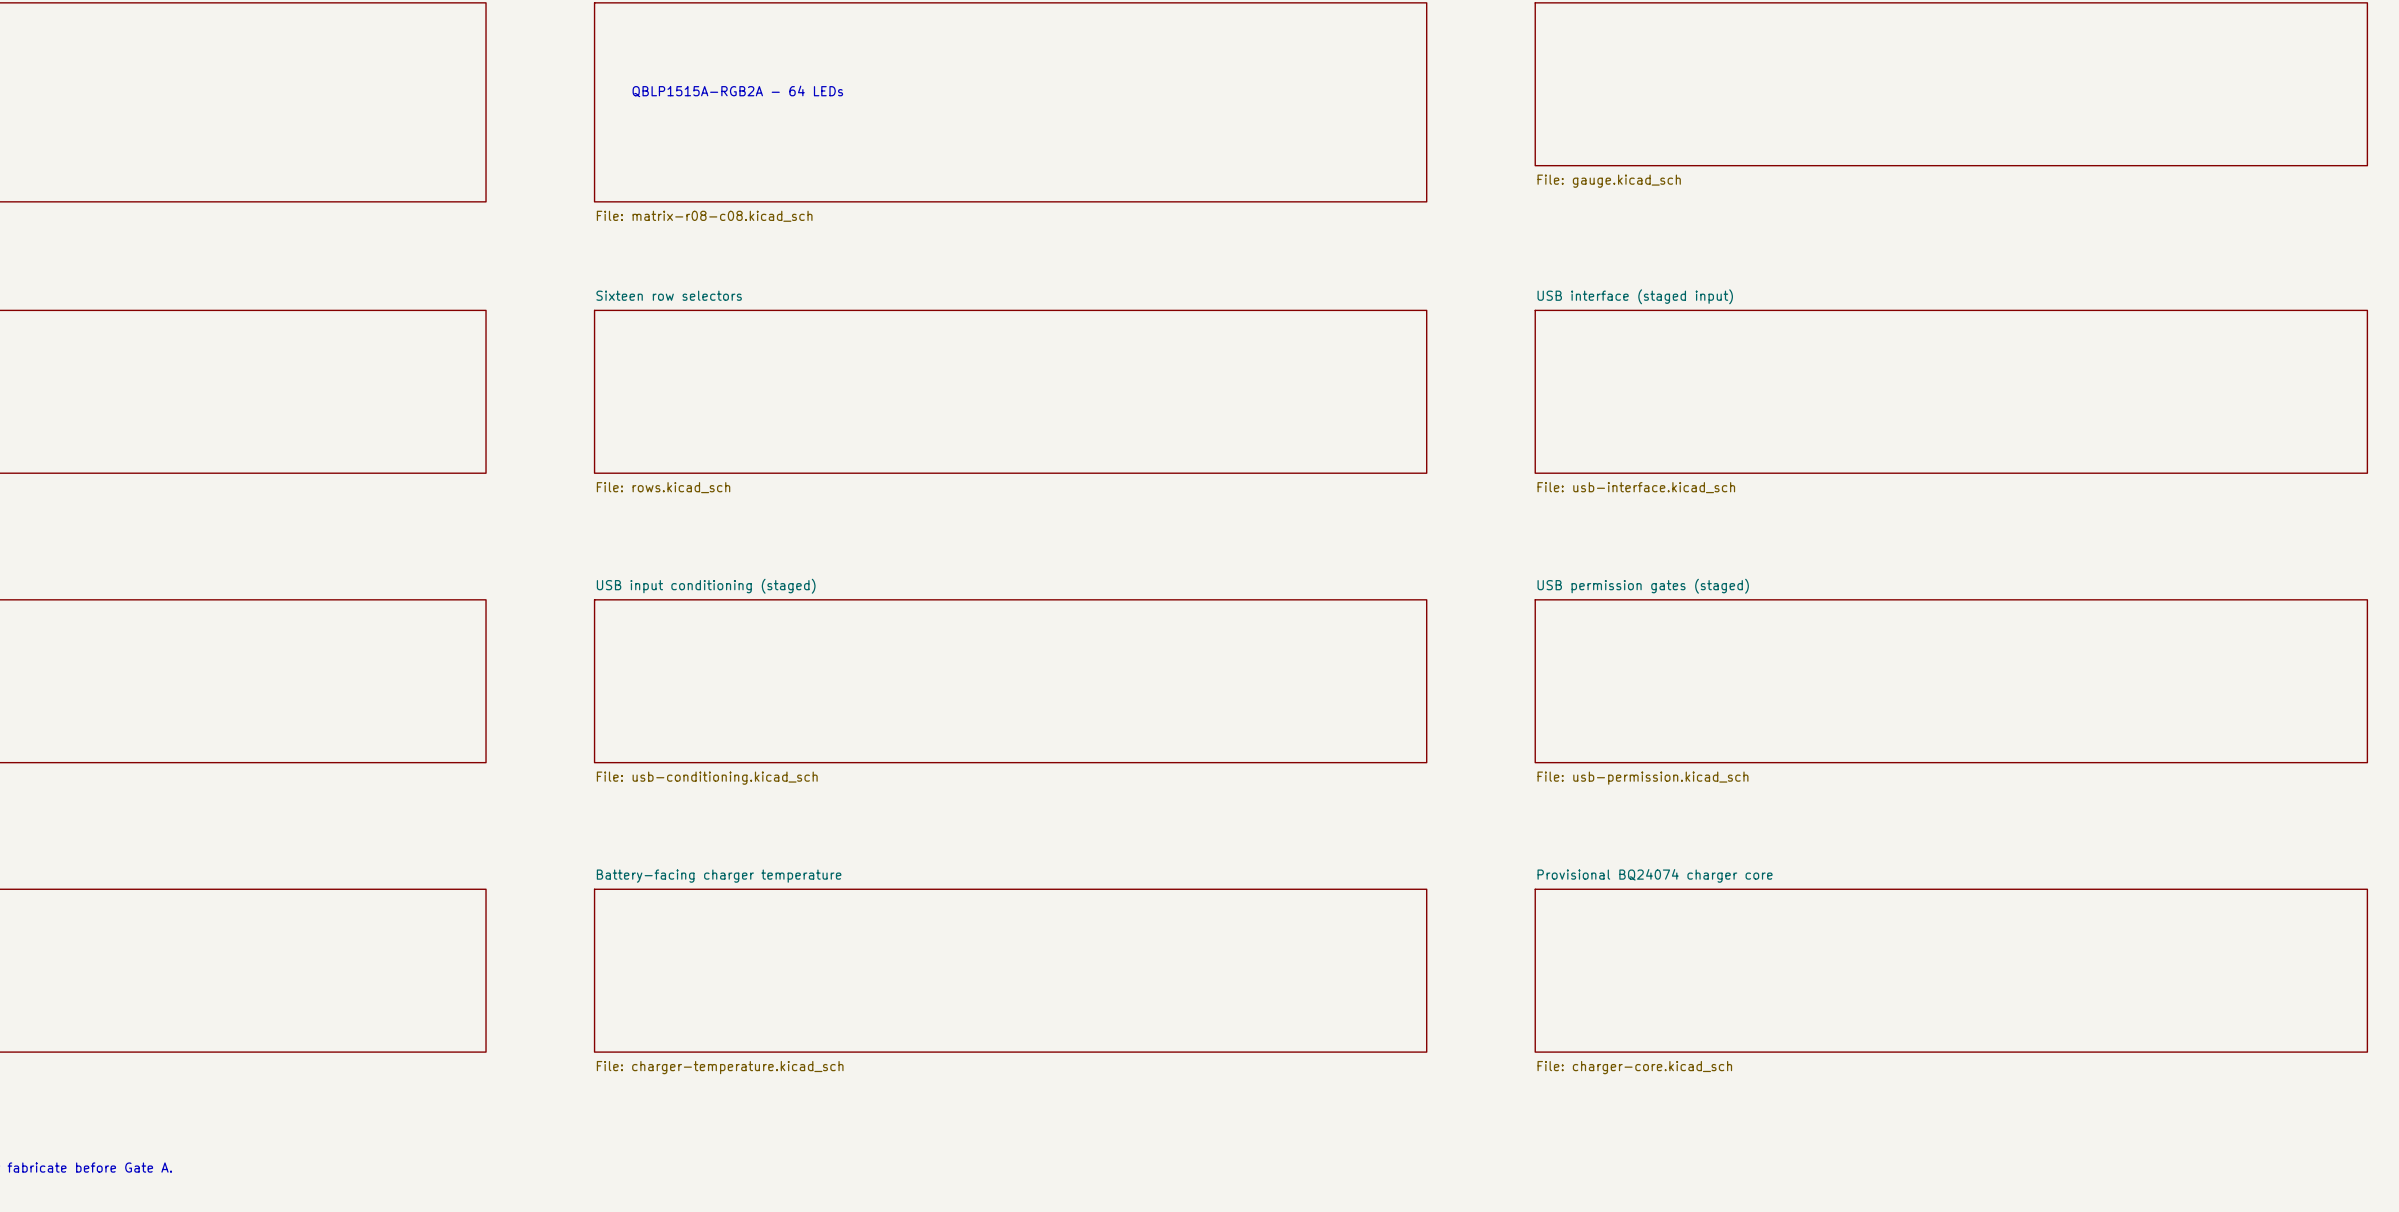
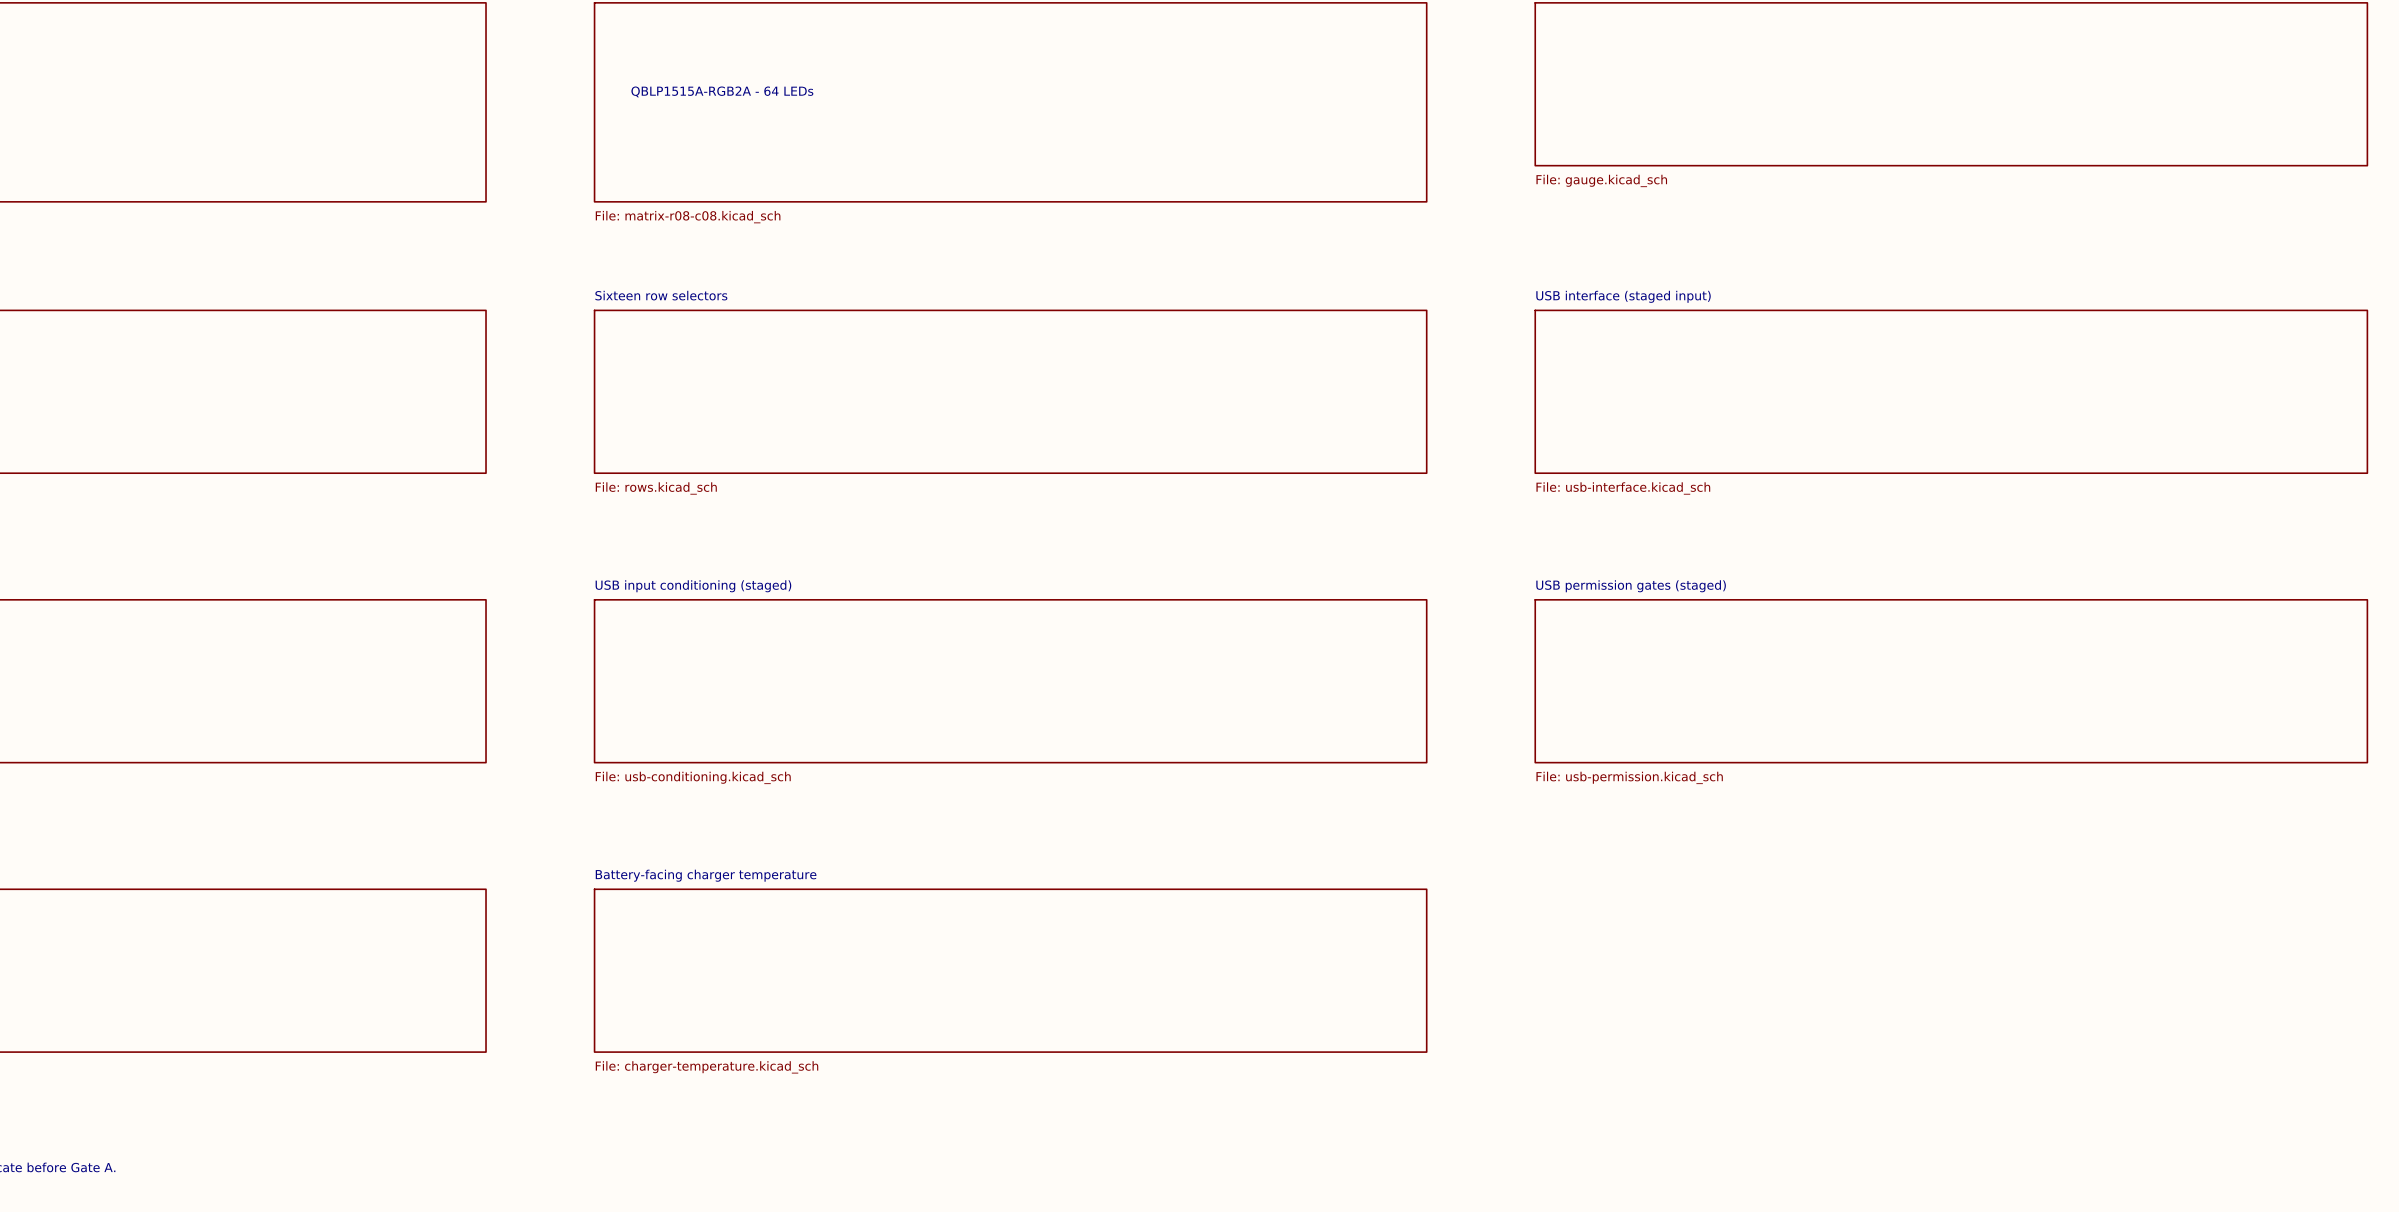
sheet Provisional BQ24074 charger core: File: charger-core.kicad_sch (1951, 970) -> none

